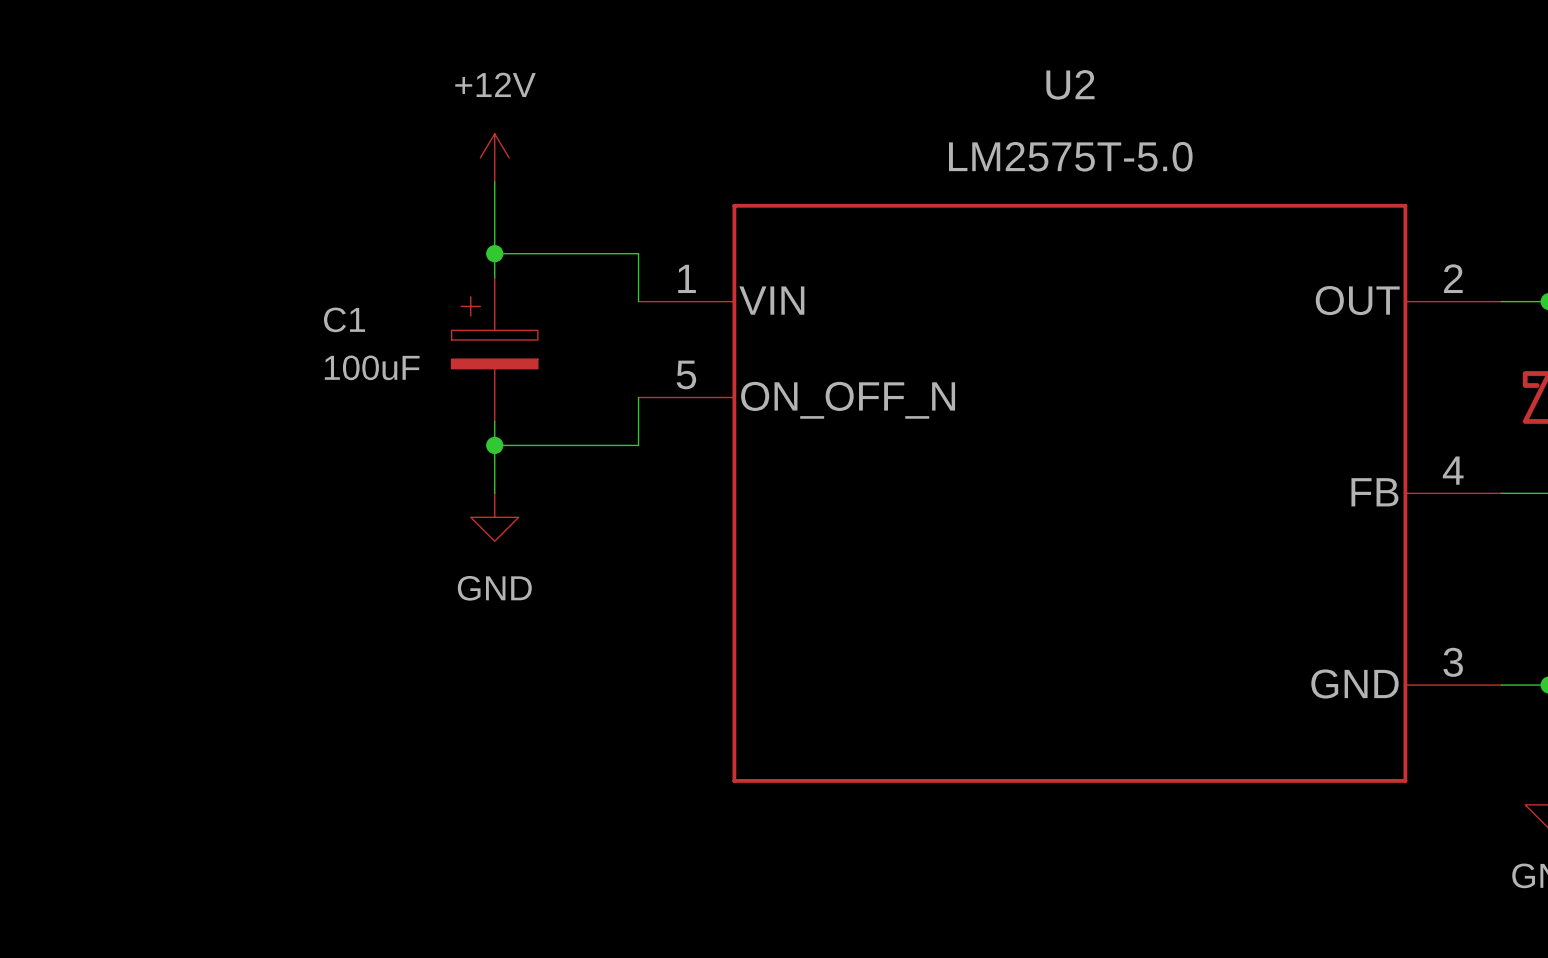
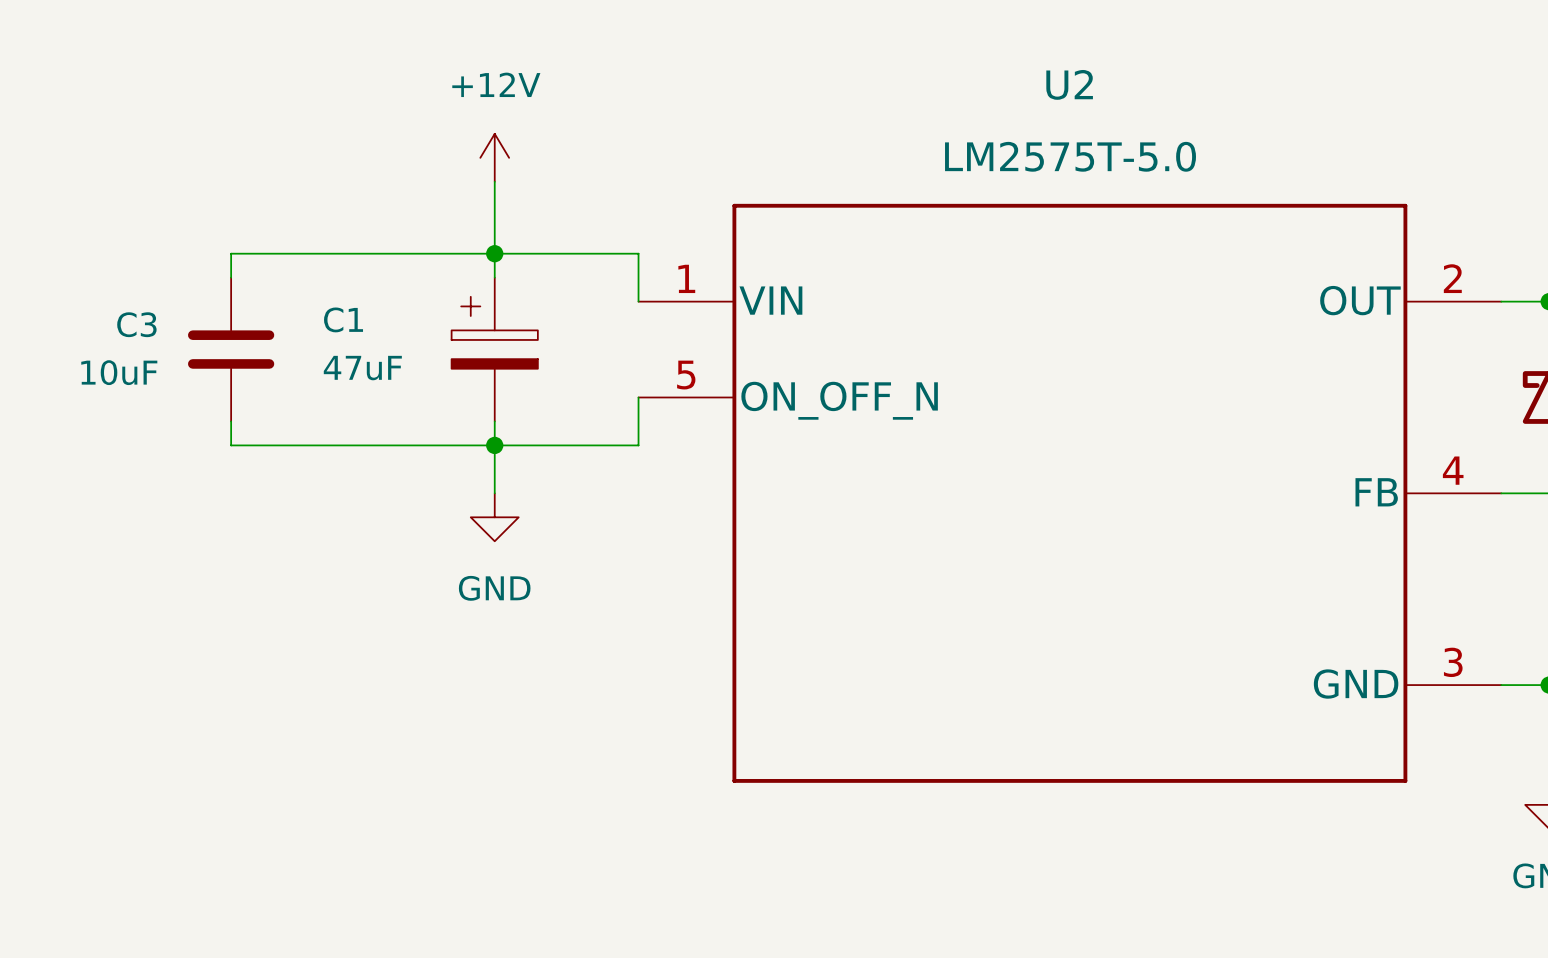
wire: none -> (494, 253) (231, 253) (231, 277)
C3: none -> 10uF (231, 349)
C1 value: 100uF (372, 367) -> 47uF (362, 368)
wire: none -> (231, 421) (231, 445) (494, 445)

